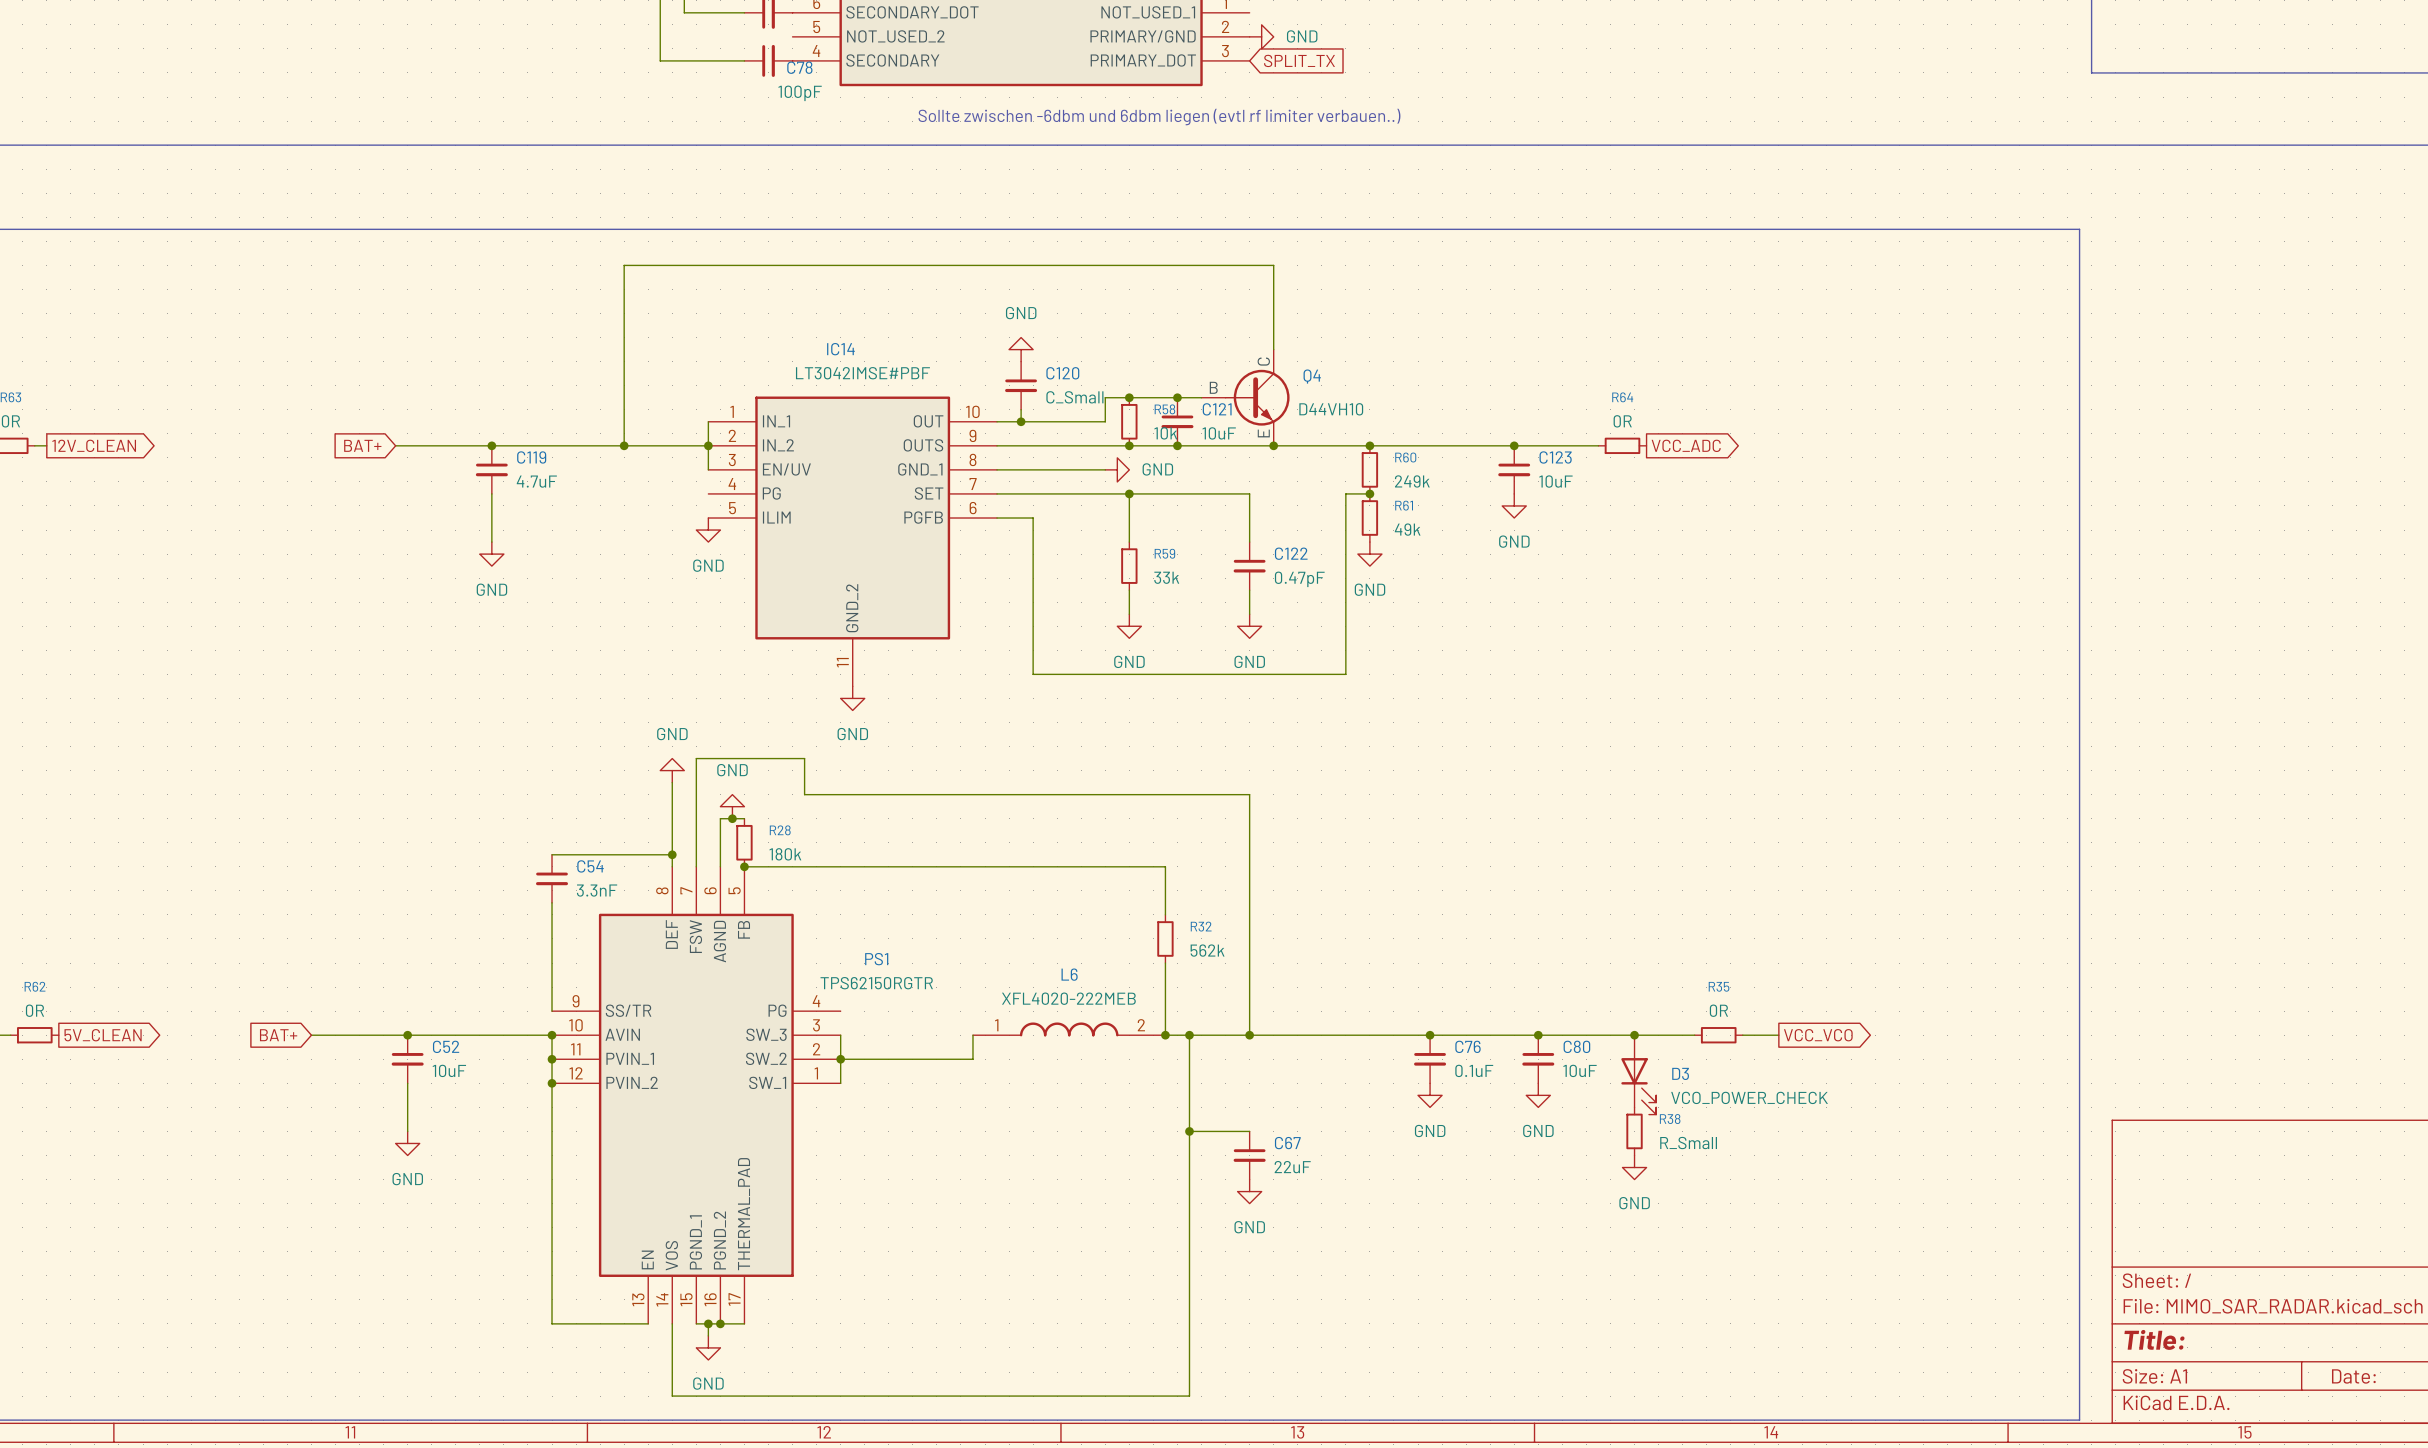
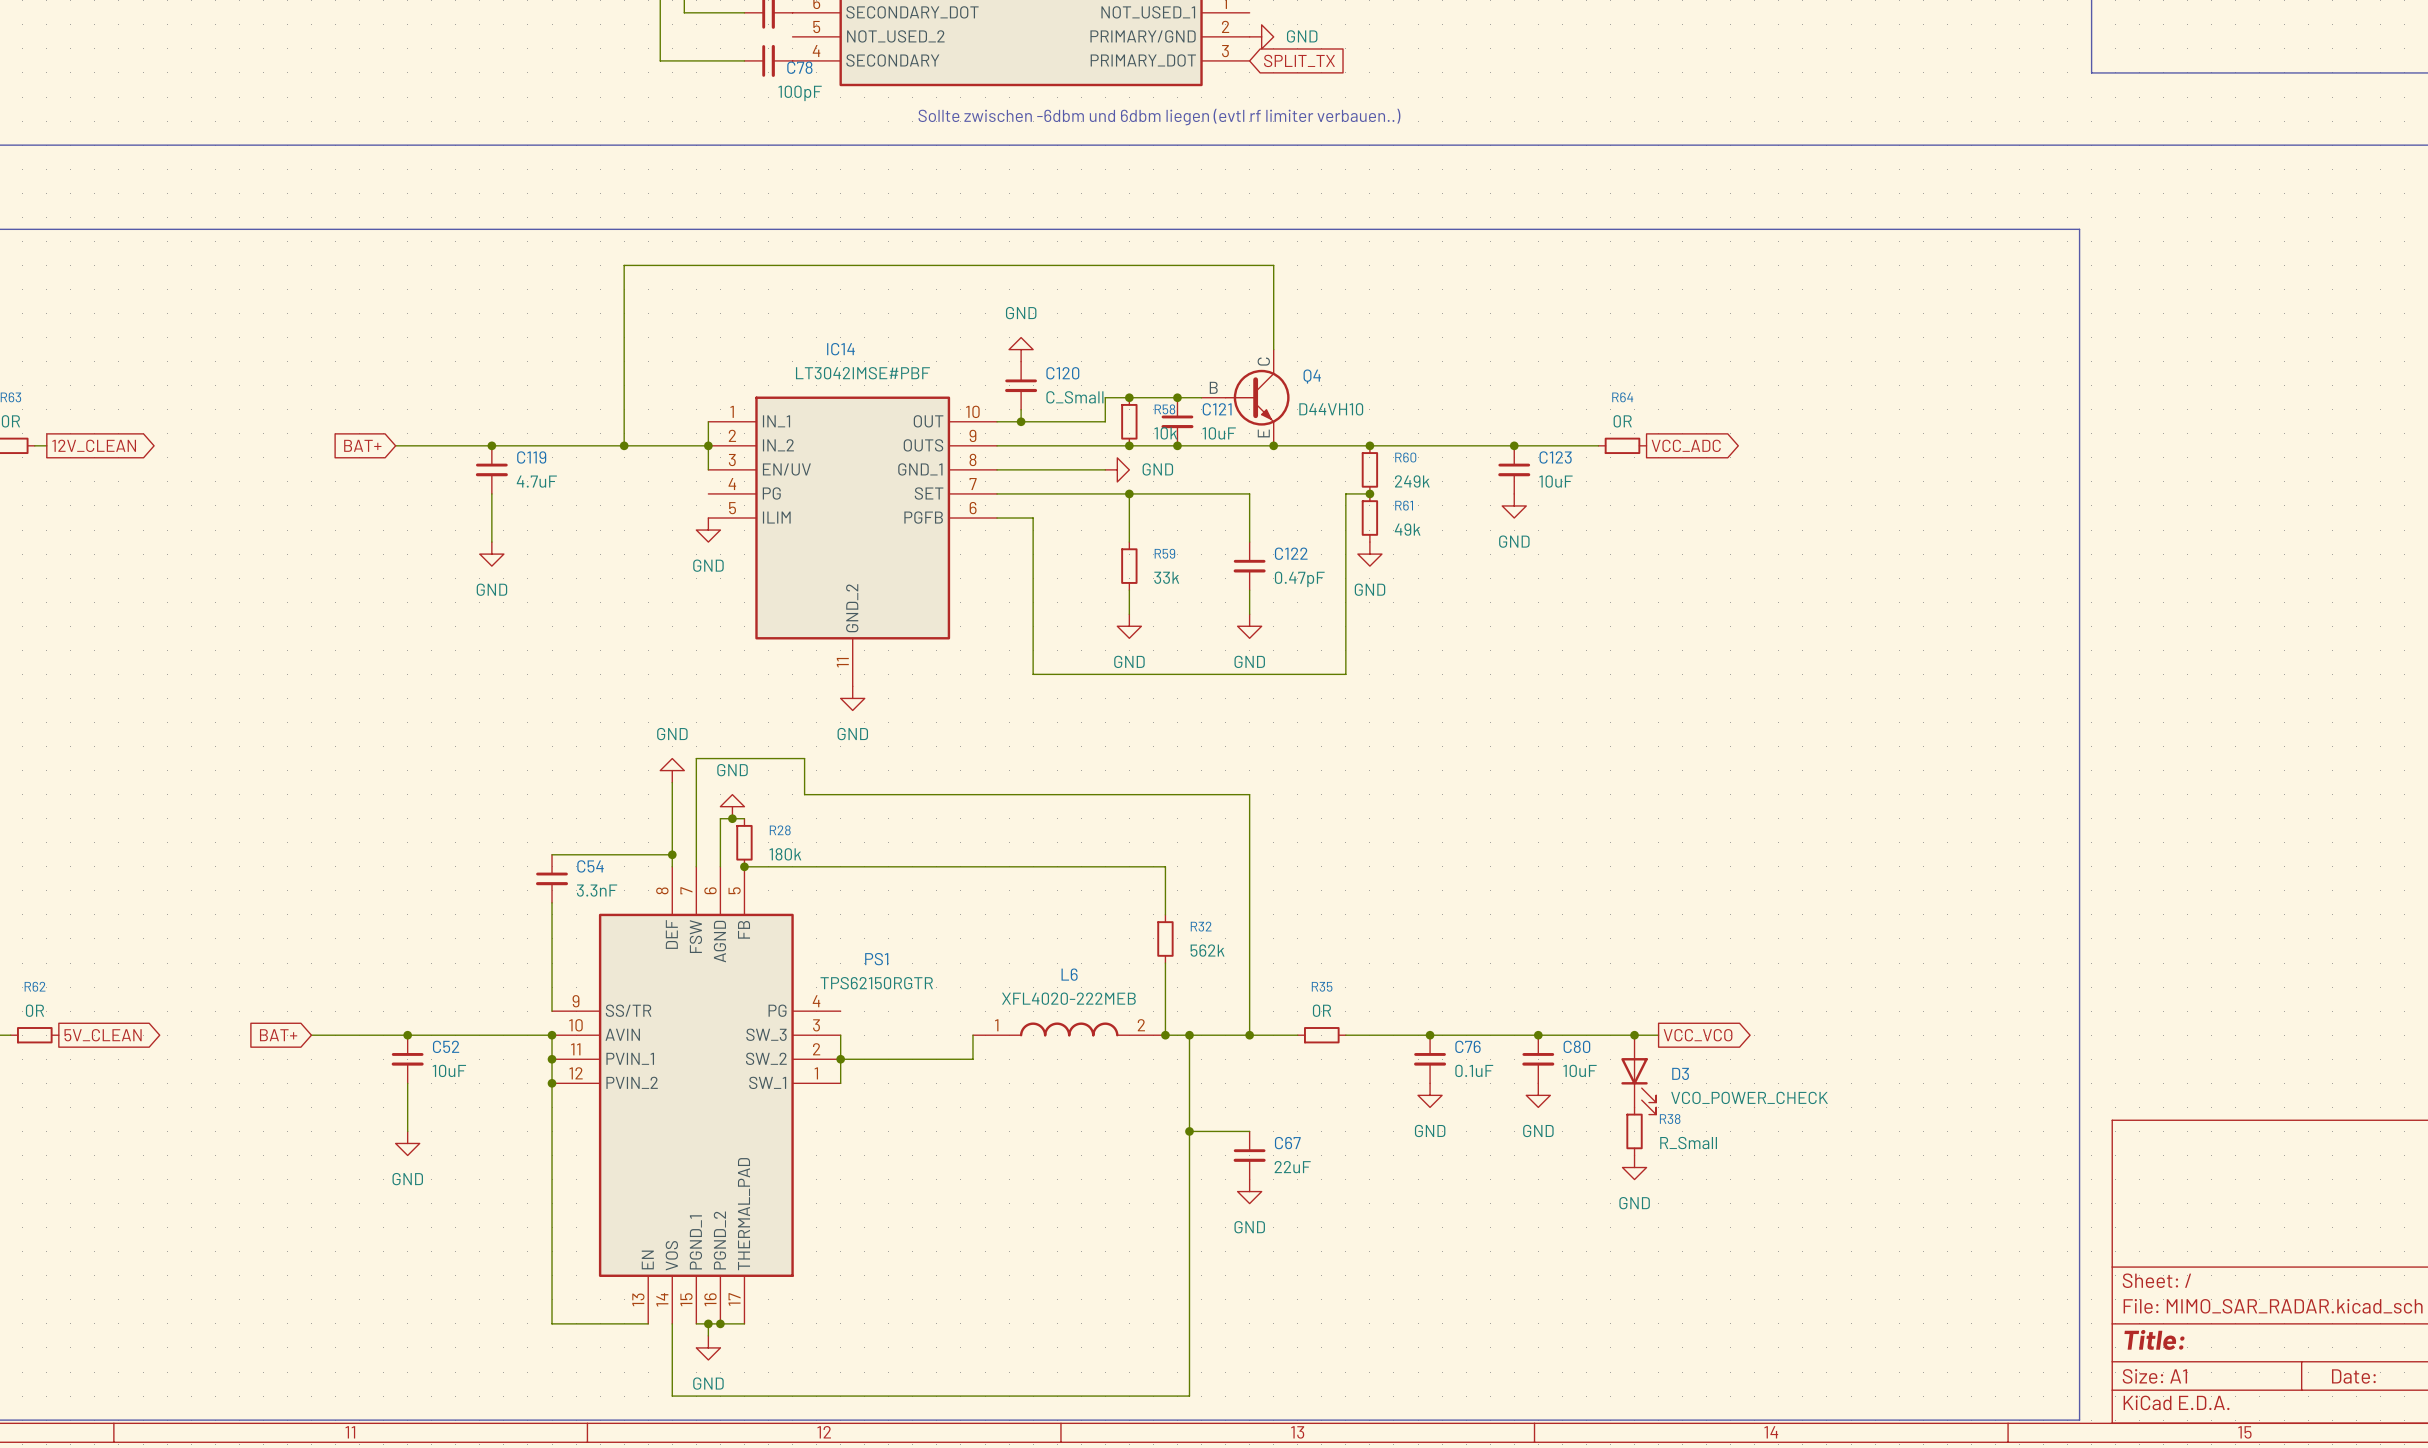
wire: (1297, 1035) (1345, 1035) -> none
wire: (1658, 1035) (1694, 1035) -> none
R35 position: (1718, 1035) -> (1321, 1035)
wire: (1742, 1035) (1778, 1035) -> none
global label position: VCC_VCO (1818, 1035) -> VCC_VCO (1698, 1035)

